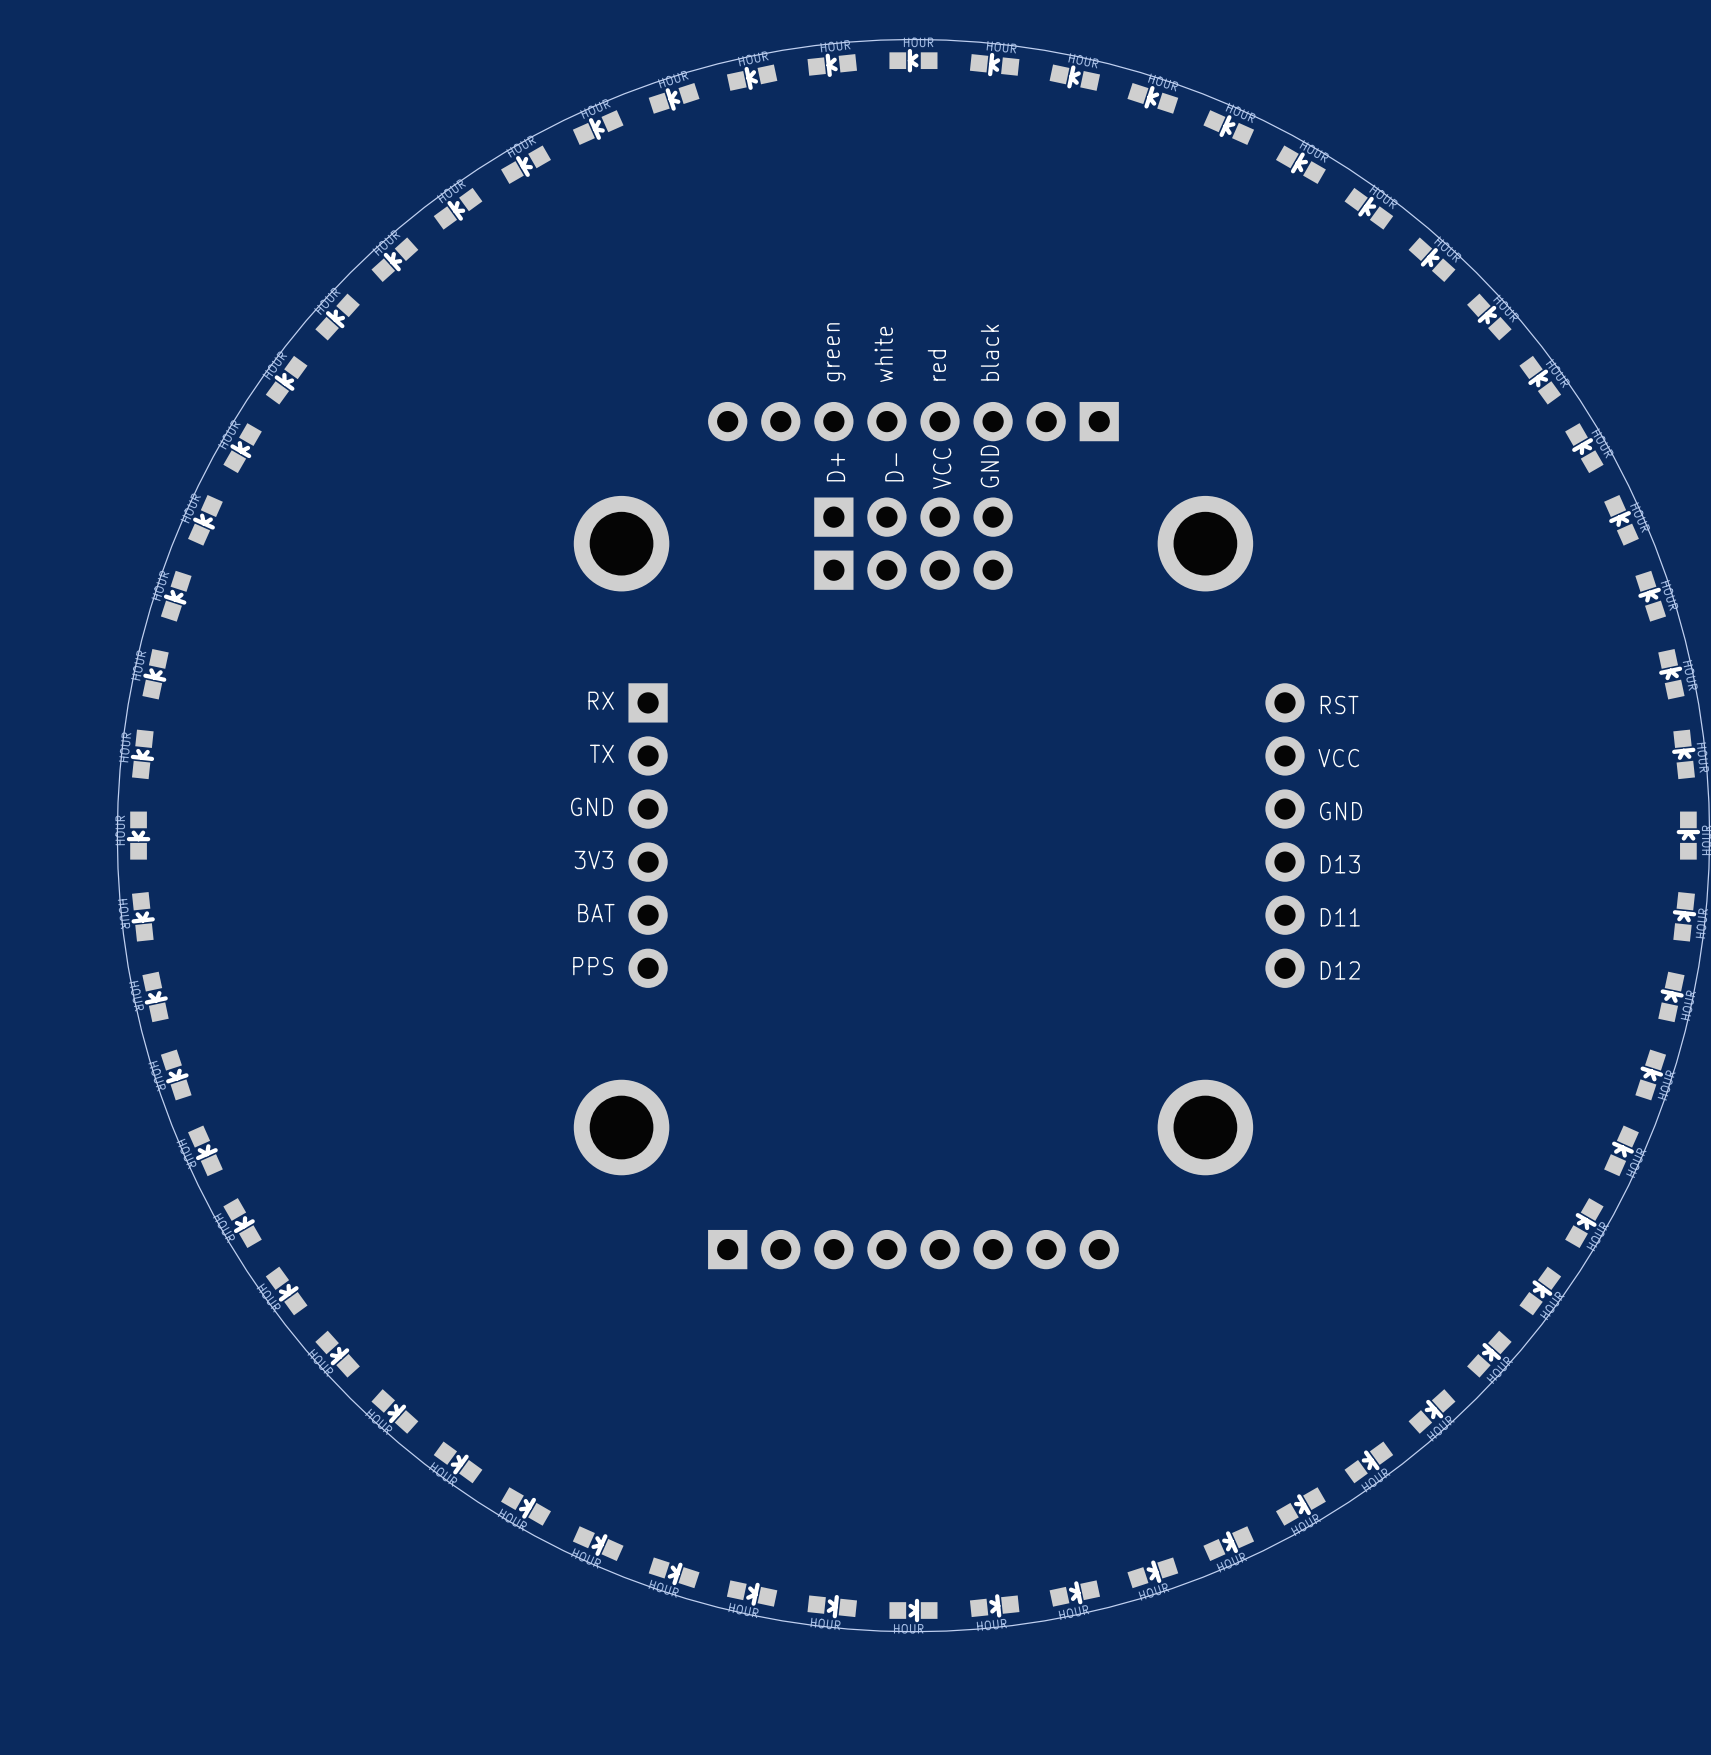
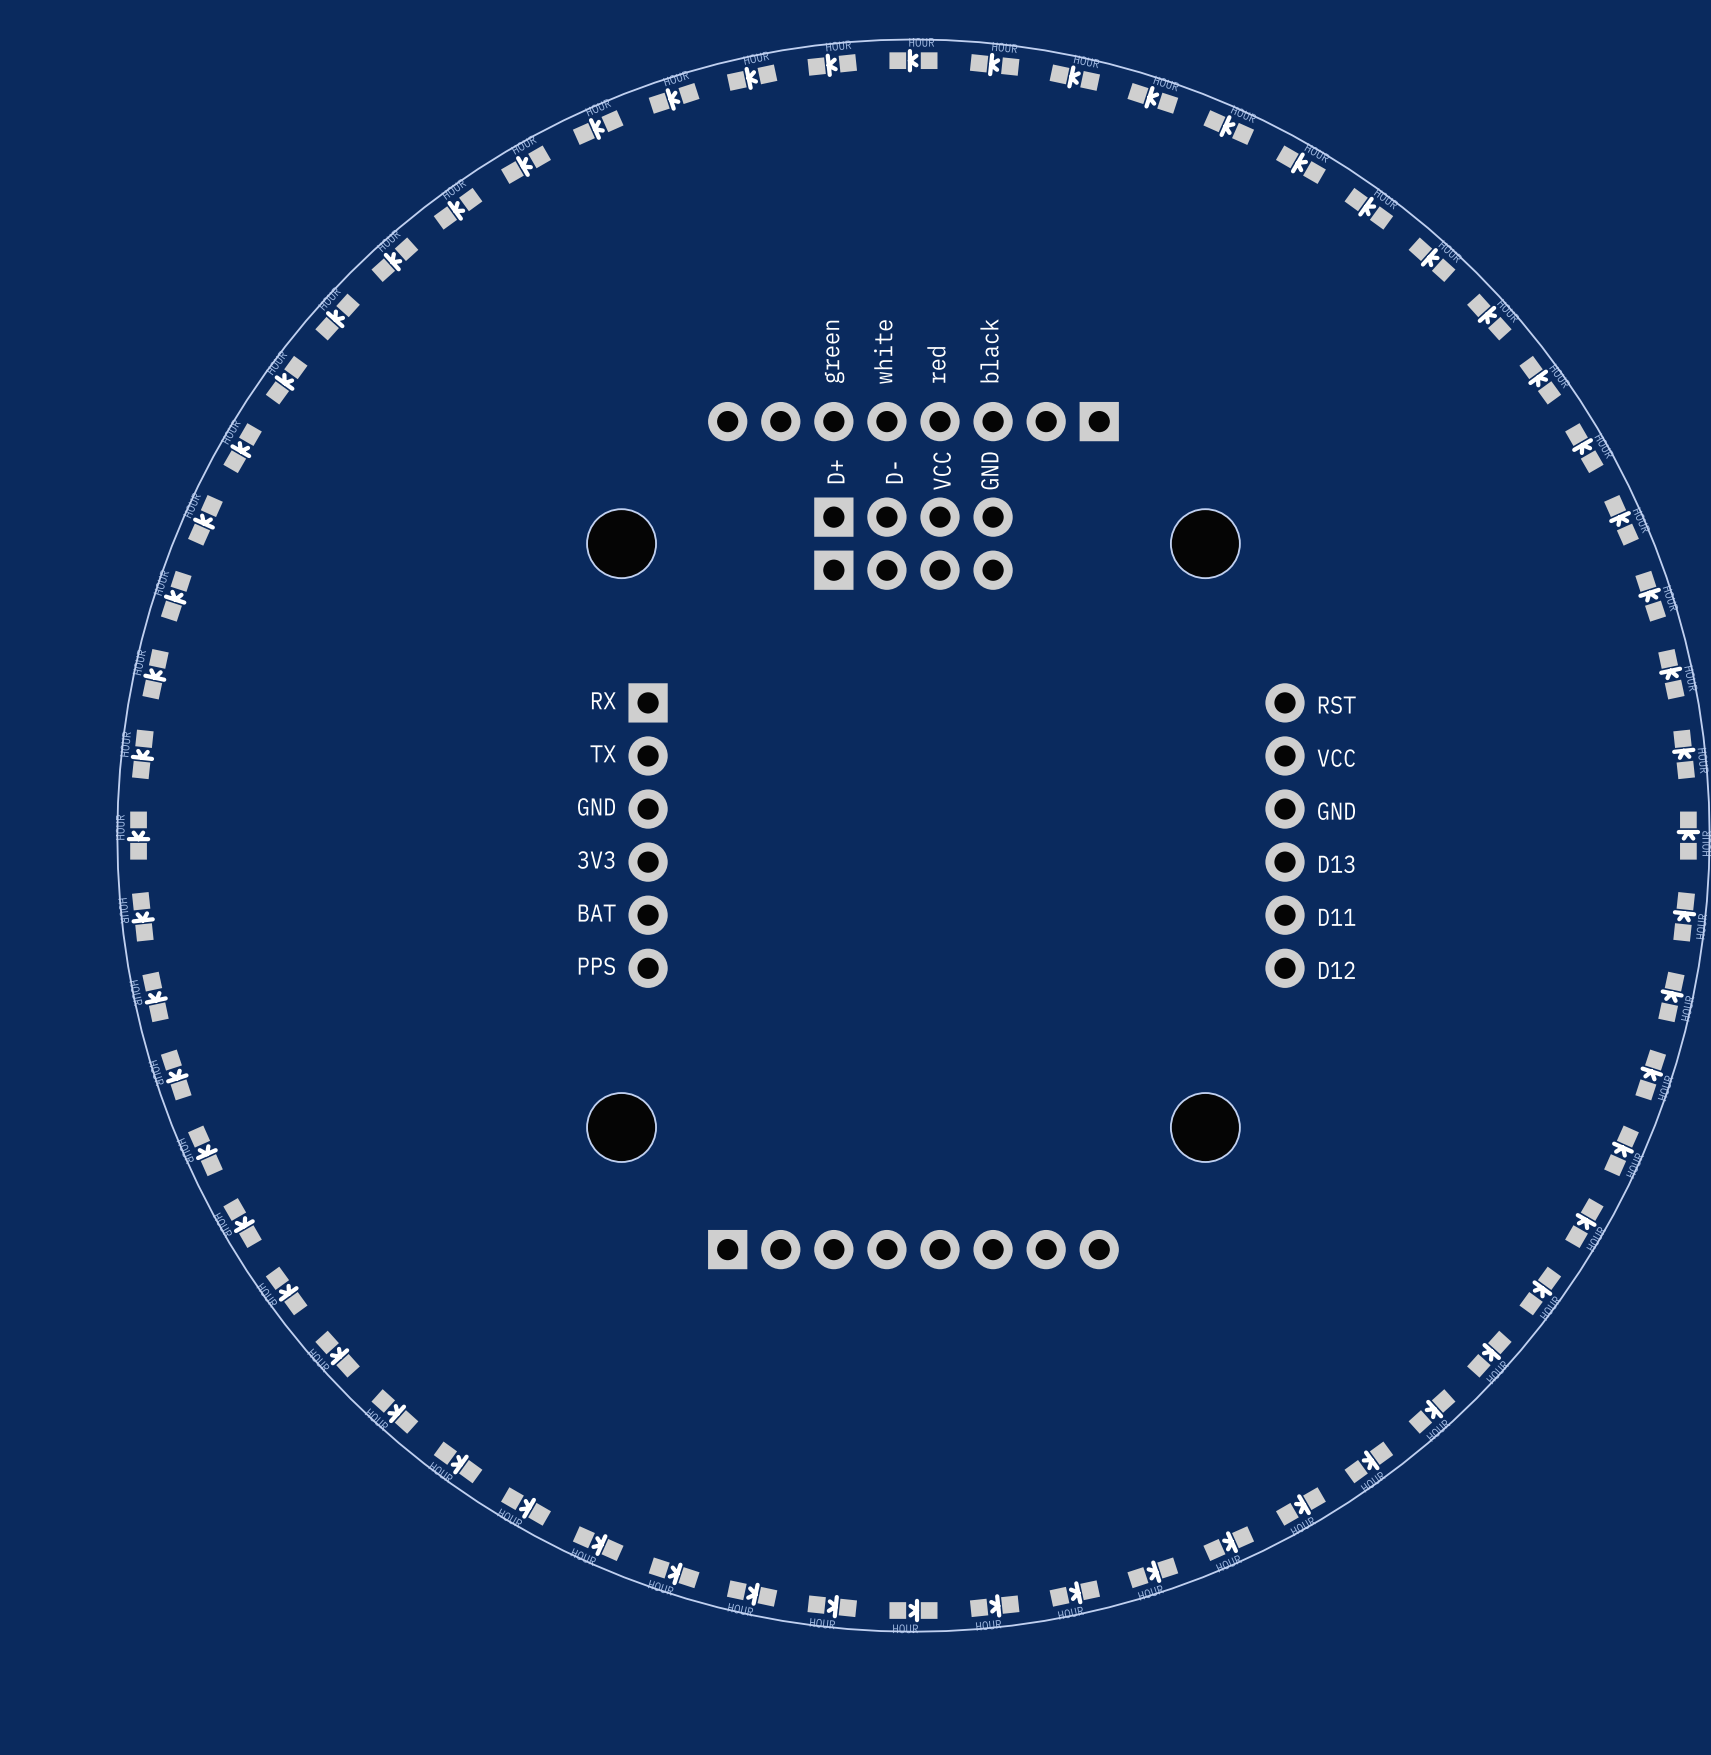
part footprint: [573, 495, 670, 592] -> [587, 509, 657, 579]
part footprint: [1157, 495, 1254, 592] -> [1170, 509, 1240, 579]
part footprint: [573, 1079, 670, 1176] -> [587, 1093, 657, 1163]
part footprint: [1157, 1079, 1254, 1176] -> [1170, 1093, 1240, 1163]

